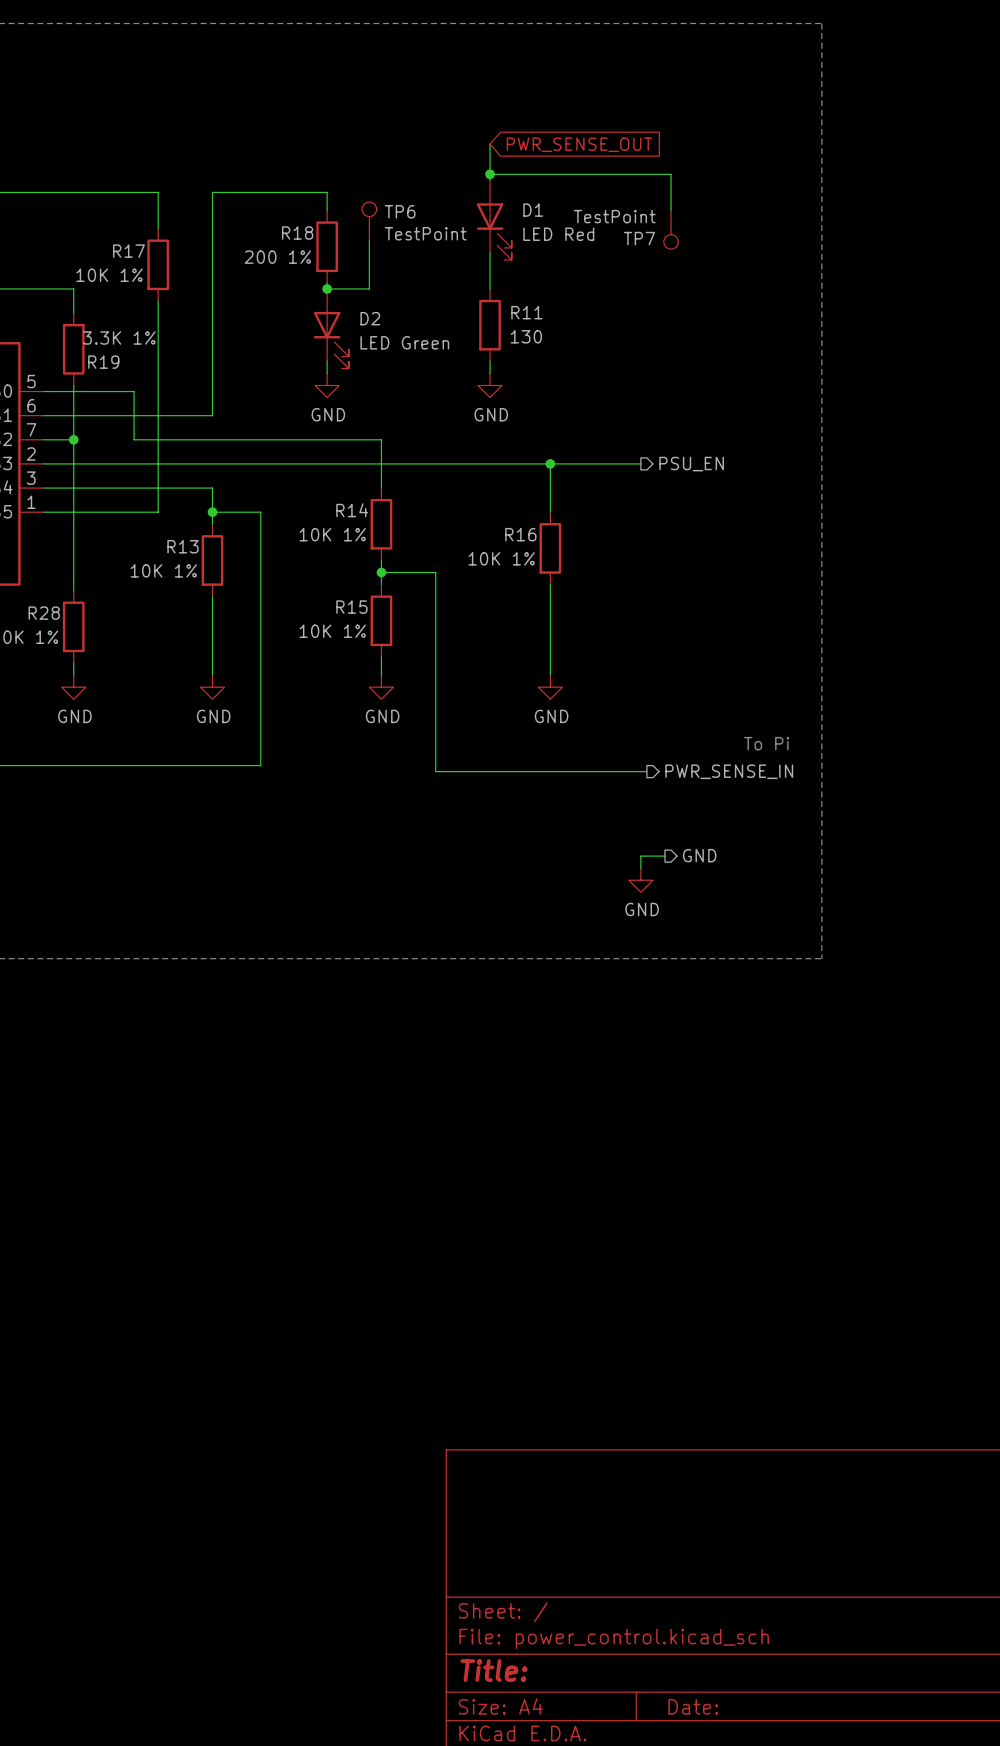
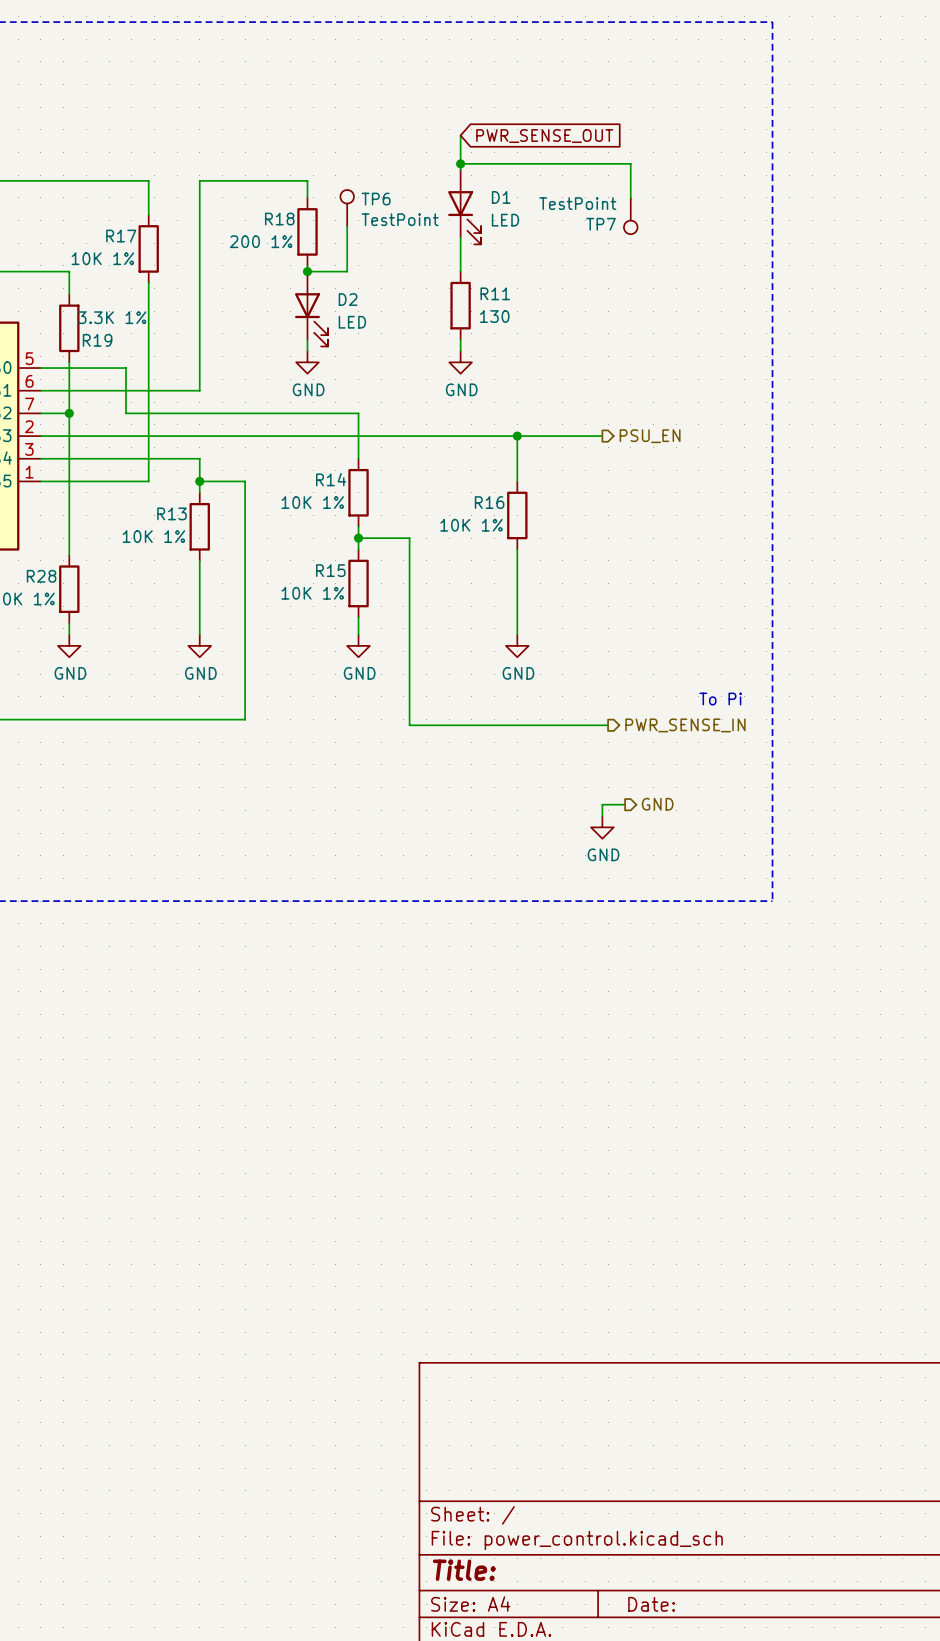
D1 value: LED Red (558, 234) -> LED (505, 220)
D2 value: LED Green (404, 342) -> LED (352, 322)

